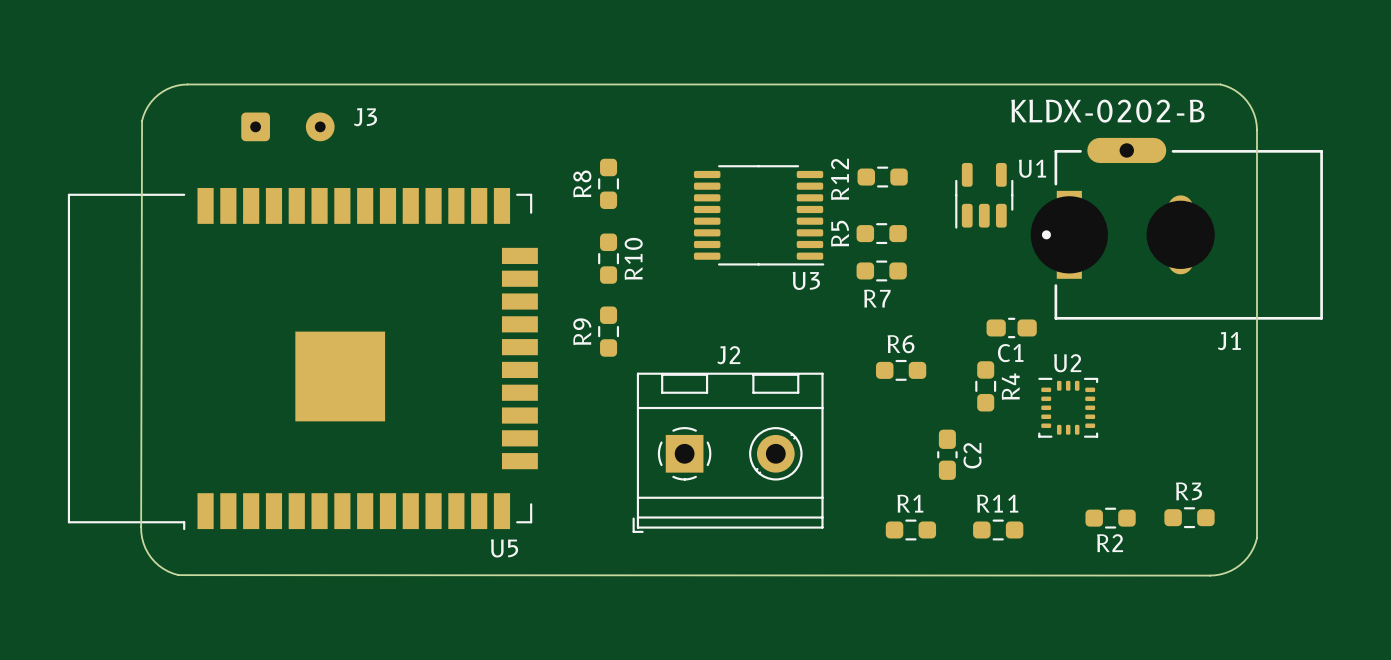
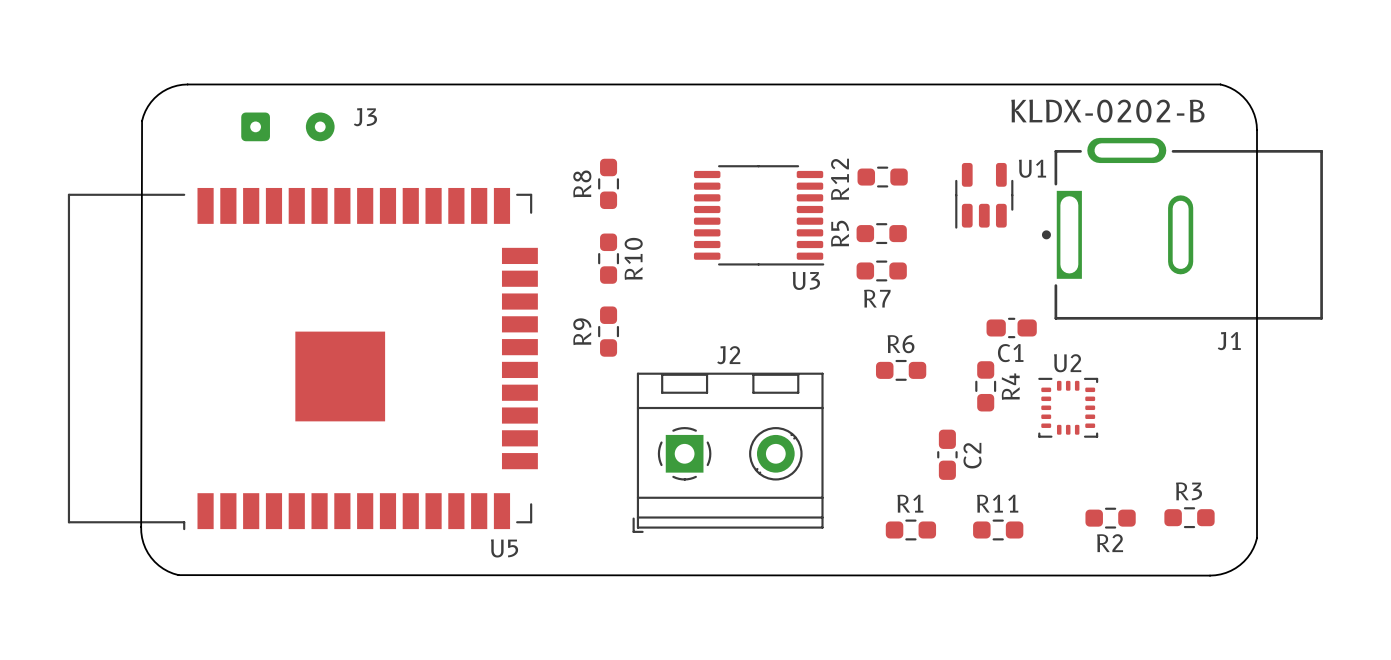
J1 footprint: [1030, 137, 1323, 320] -> [1041, 137, 1323, 320]

